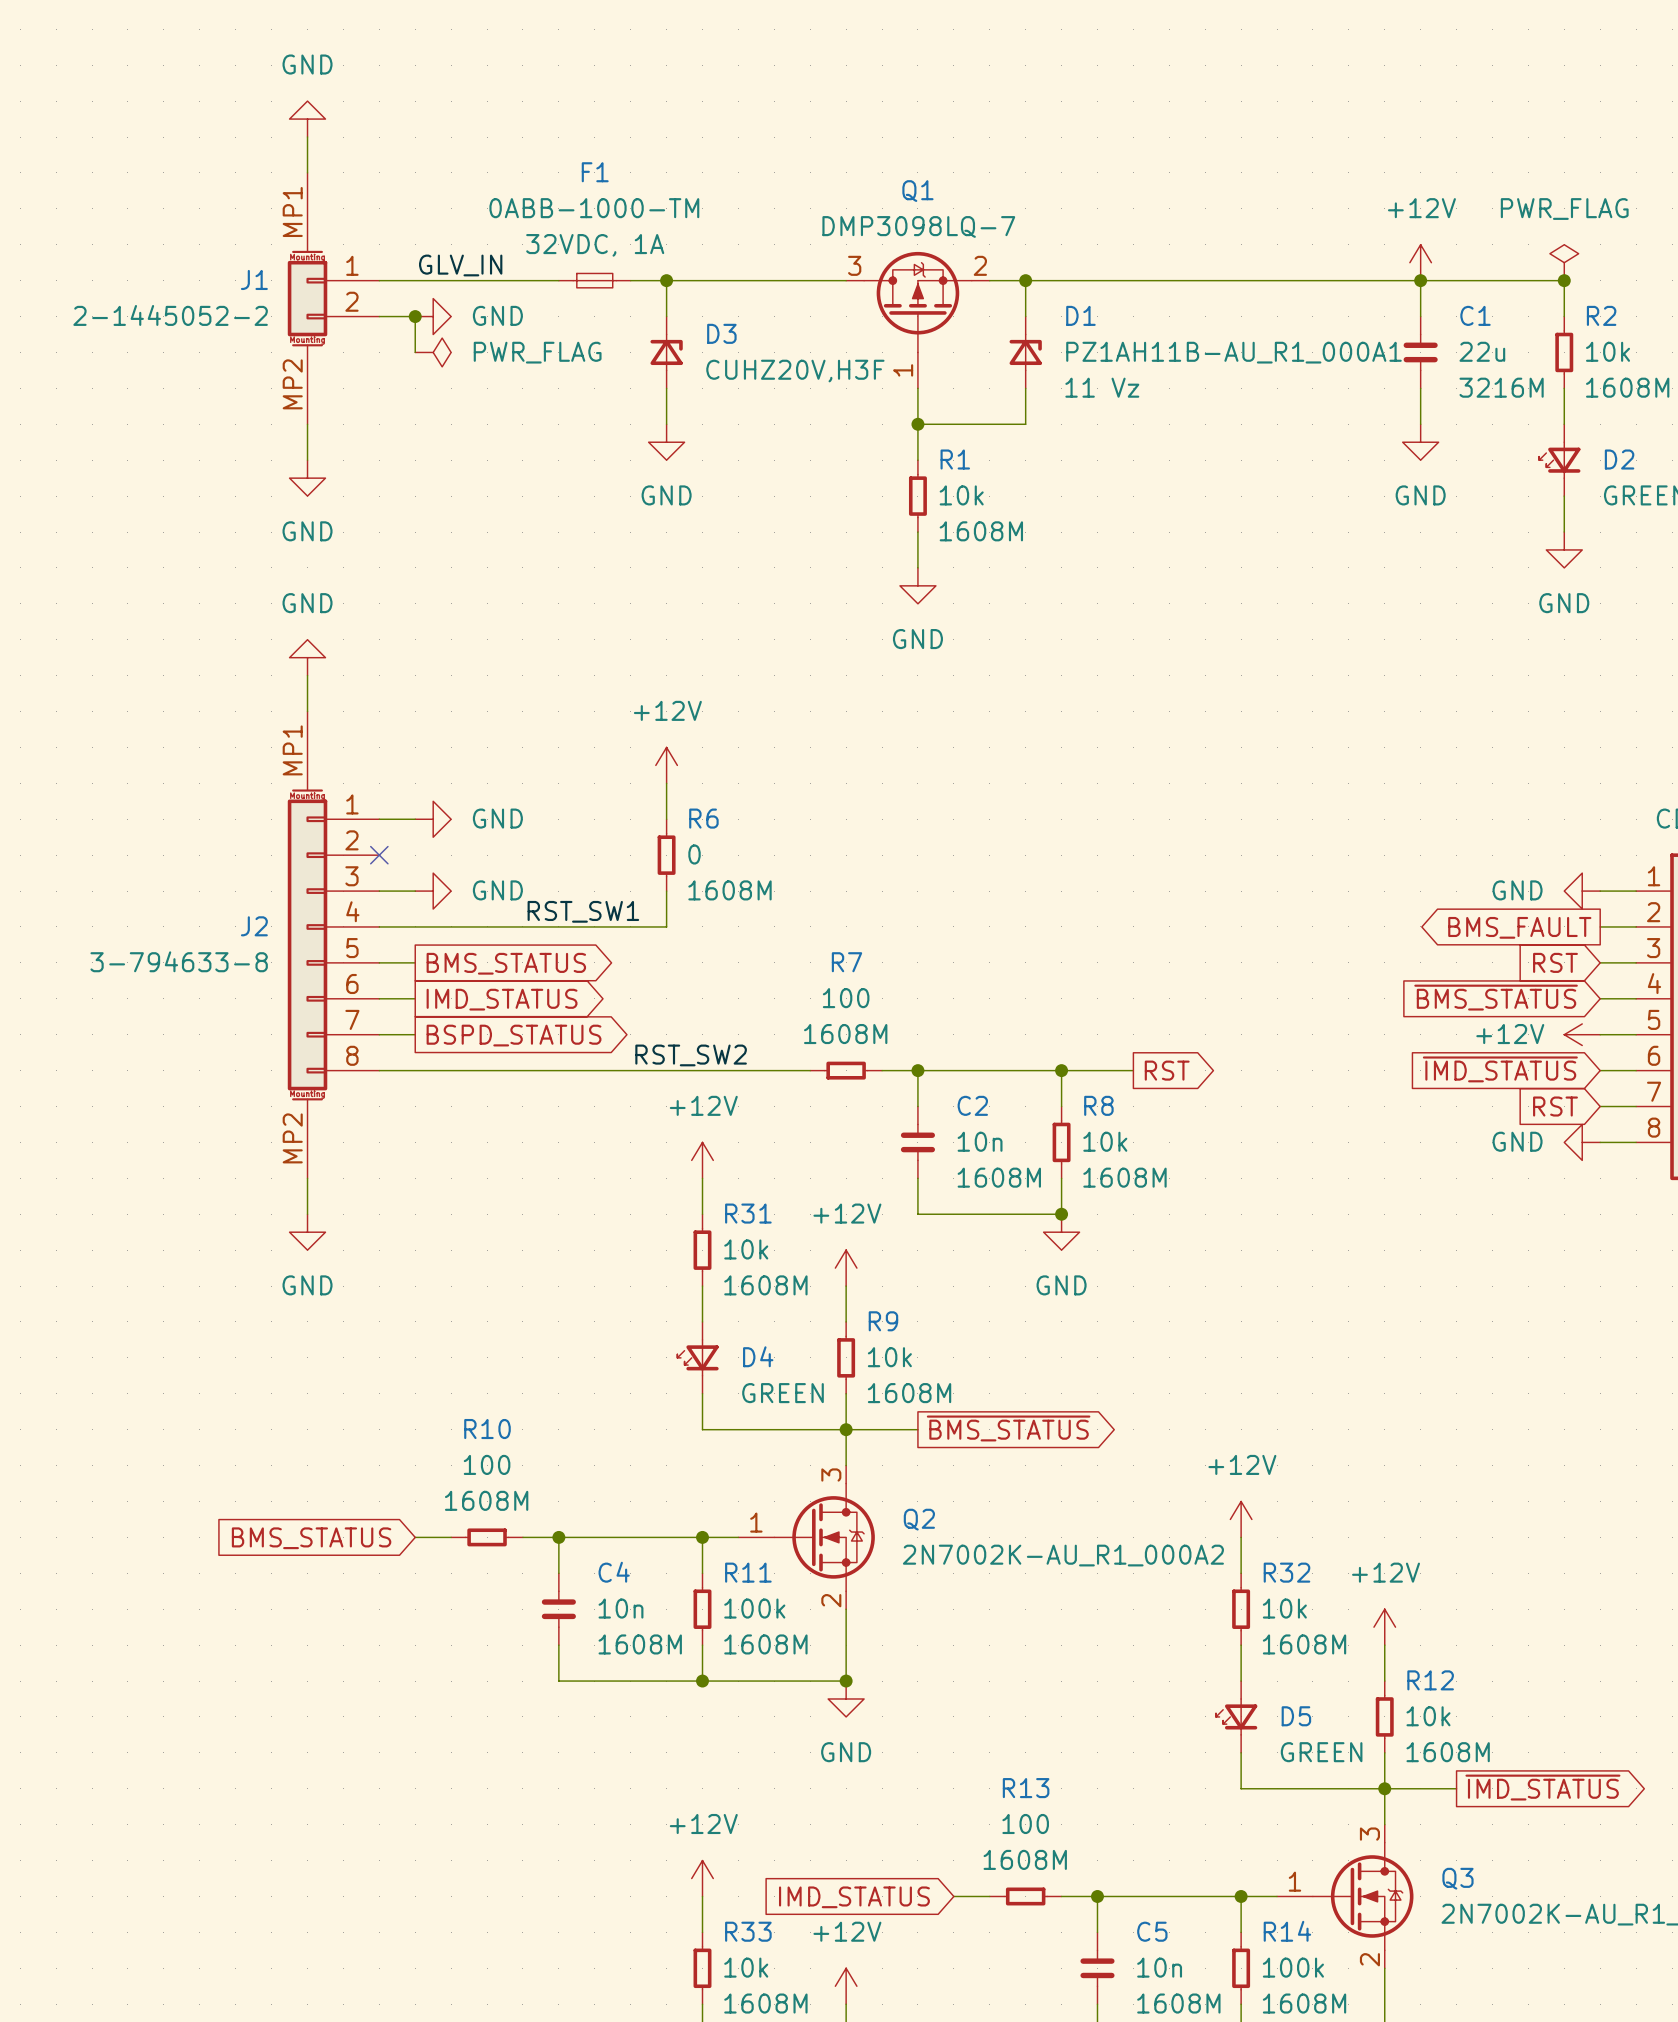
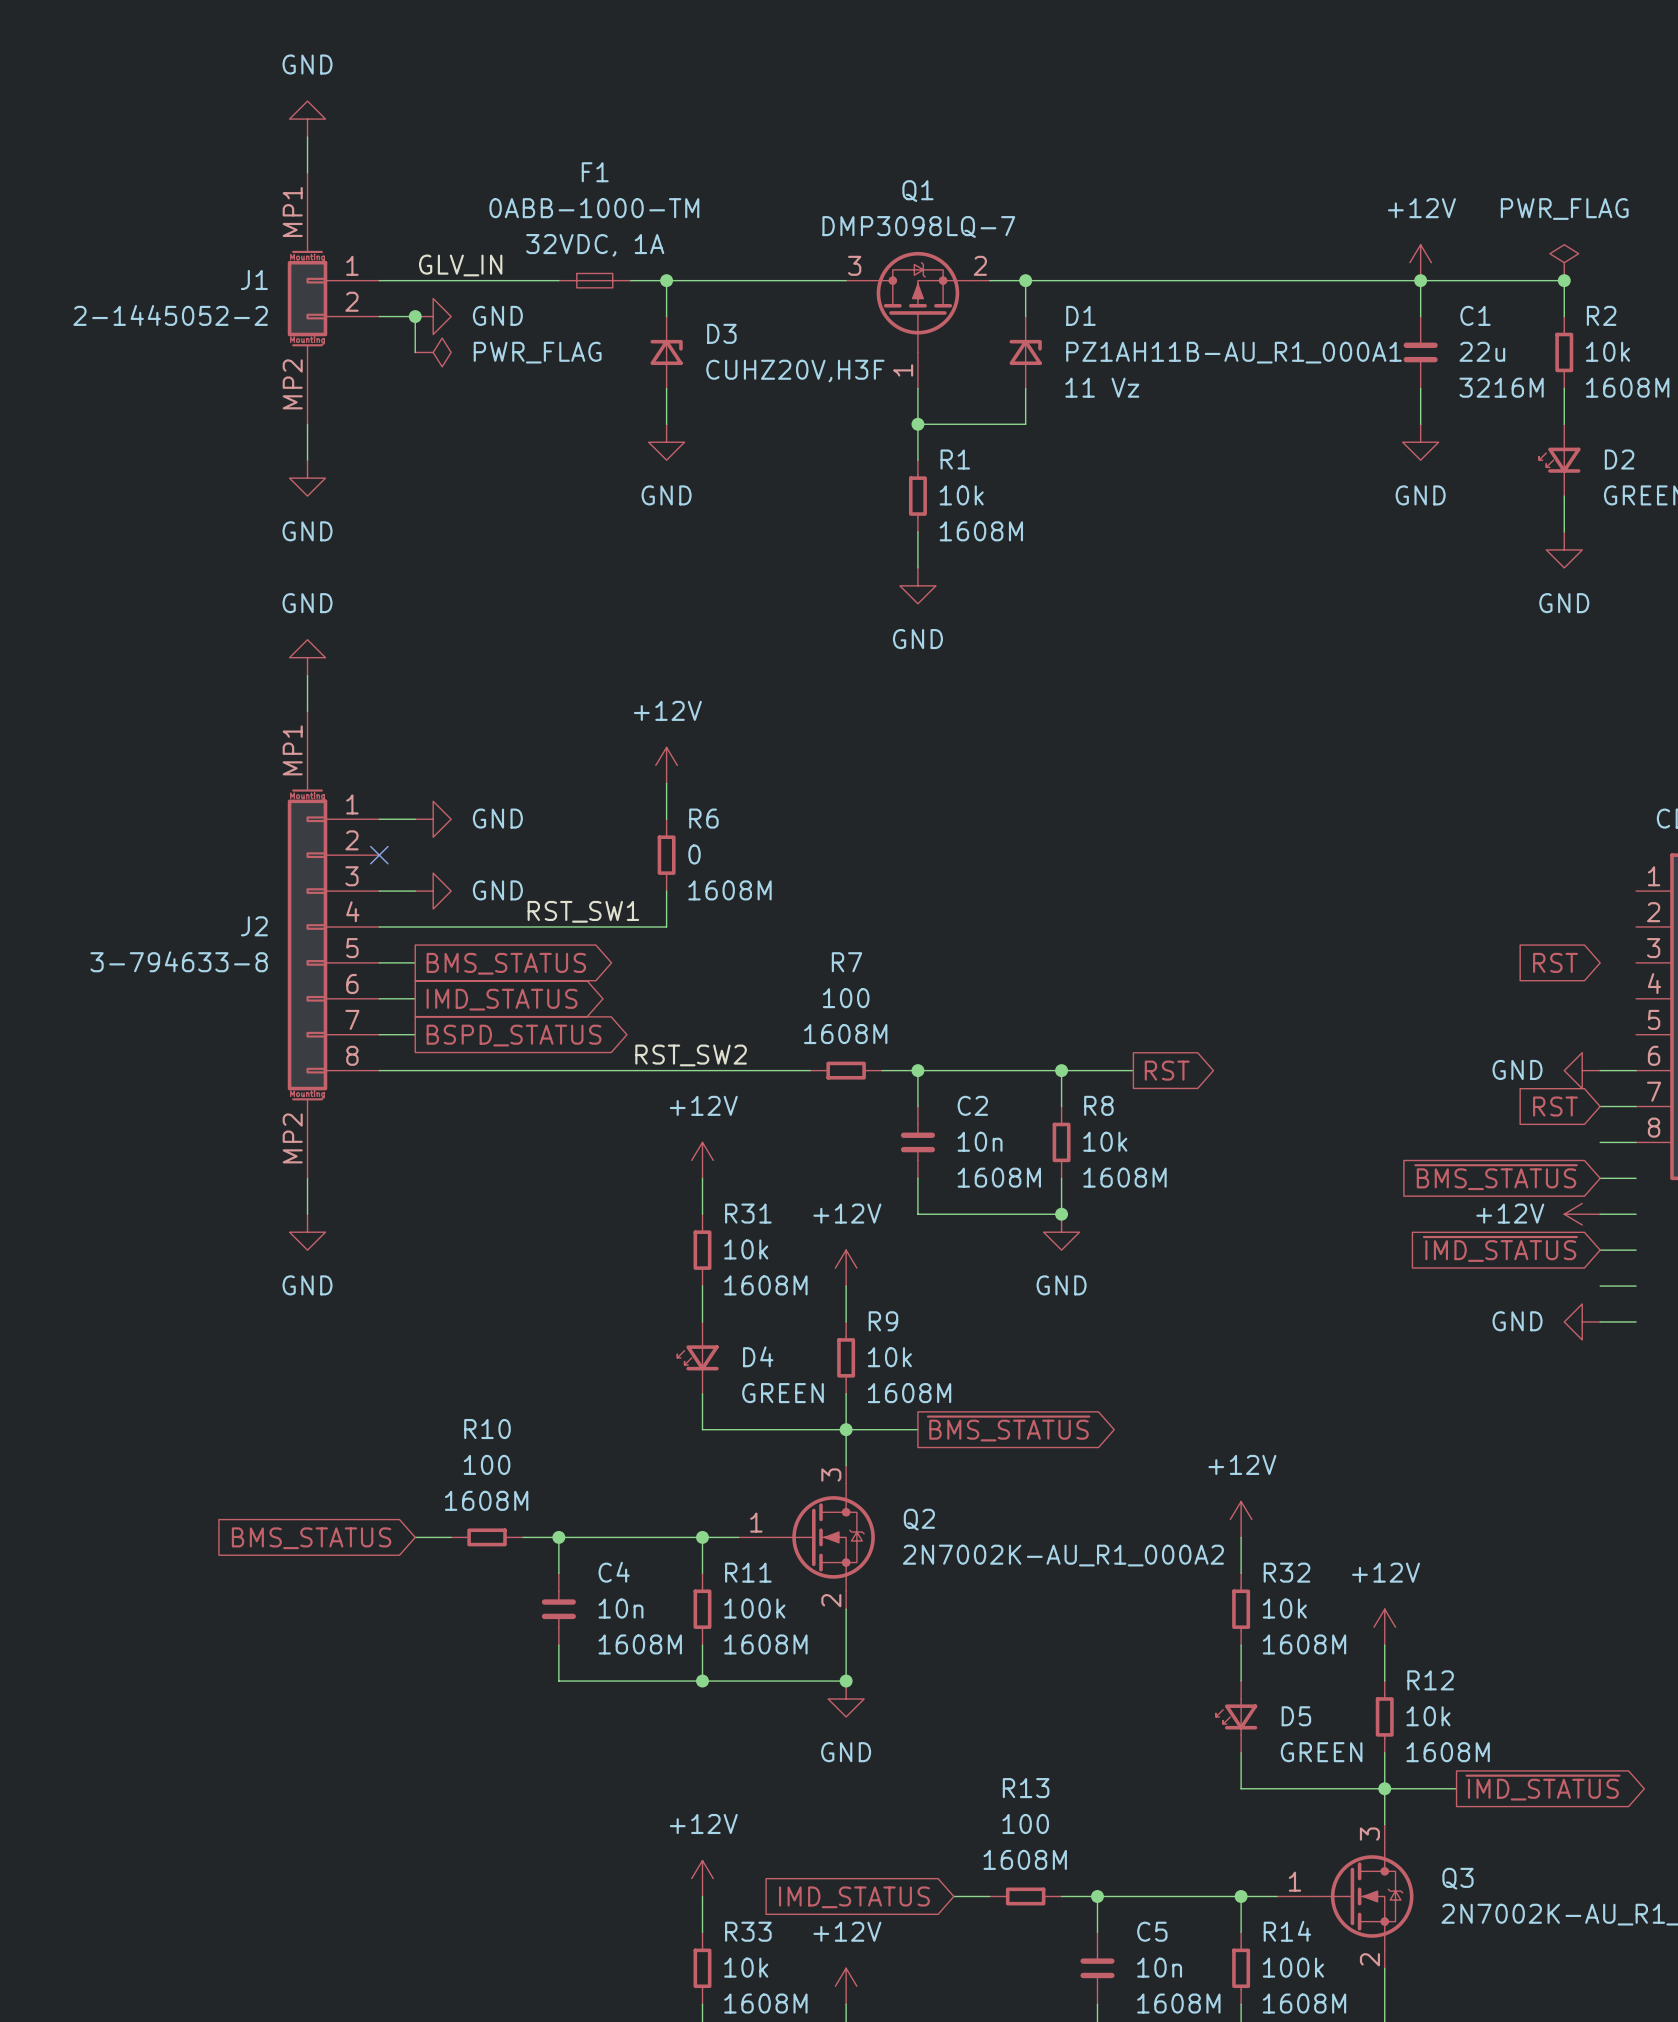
power symbol: GND (1582, 891) -> none
wire: (1600, 891) (1636, 891) -> (1600, 1178) (1636, 1178)
wire: (1600, 926) (1636, 926) -> (1600, 1214) (1636, 1214)
global label: BMS_FAULT (1519, 927) -> none
wire: (1600, 962) (1636, 962) -> (1600, 1250) (1636, 1250)
global label position: ~{BMS_STATUS} (1496, 997) -> ~{BMS_STATUS} (1496, 1177)
wire: (1600, 998) (1636, 998) -> (1600, 1286) (1636, 1286)
power symbol: +12V (1582, 1034) -> none
wire: (1600, 1034) (1636, 1034) -> (1600, 1321) (1636, 1321)
global label position: ~{IMD_STATUS} (1500, 1069) -> ~{IMD_STATUS} (1500, 1248)
power symbol position: GND (1582, 1142) -> GND (1582, 1070)
power symbol: none -> +12V (1582, 1214)
power symbol: none -> GND (1582, 1321)

